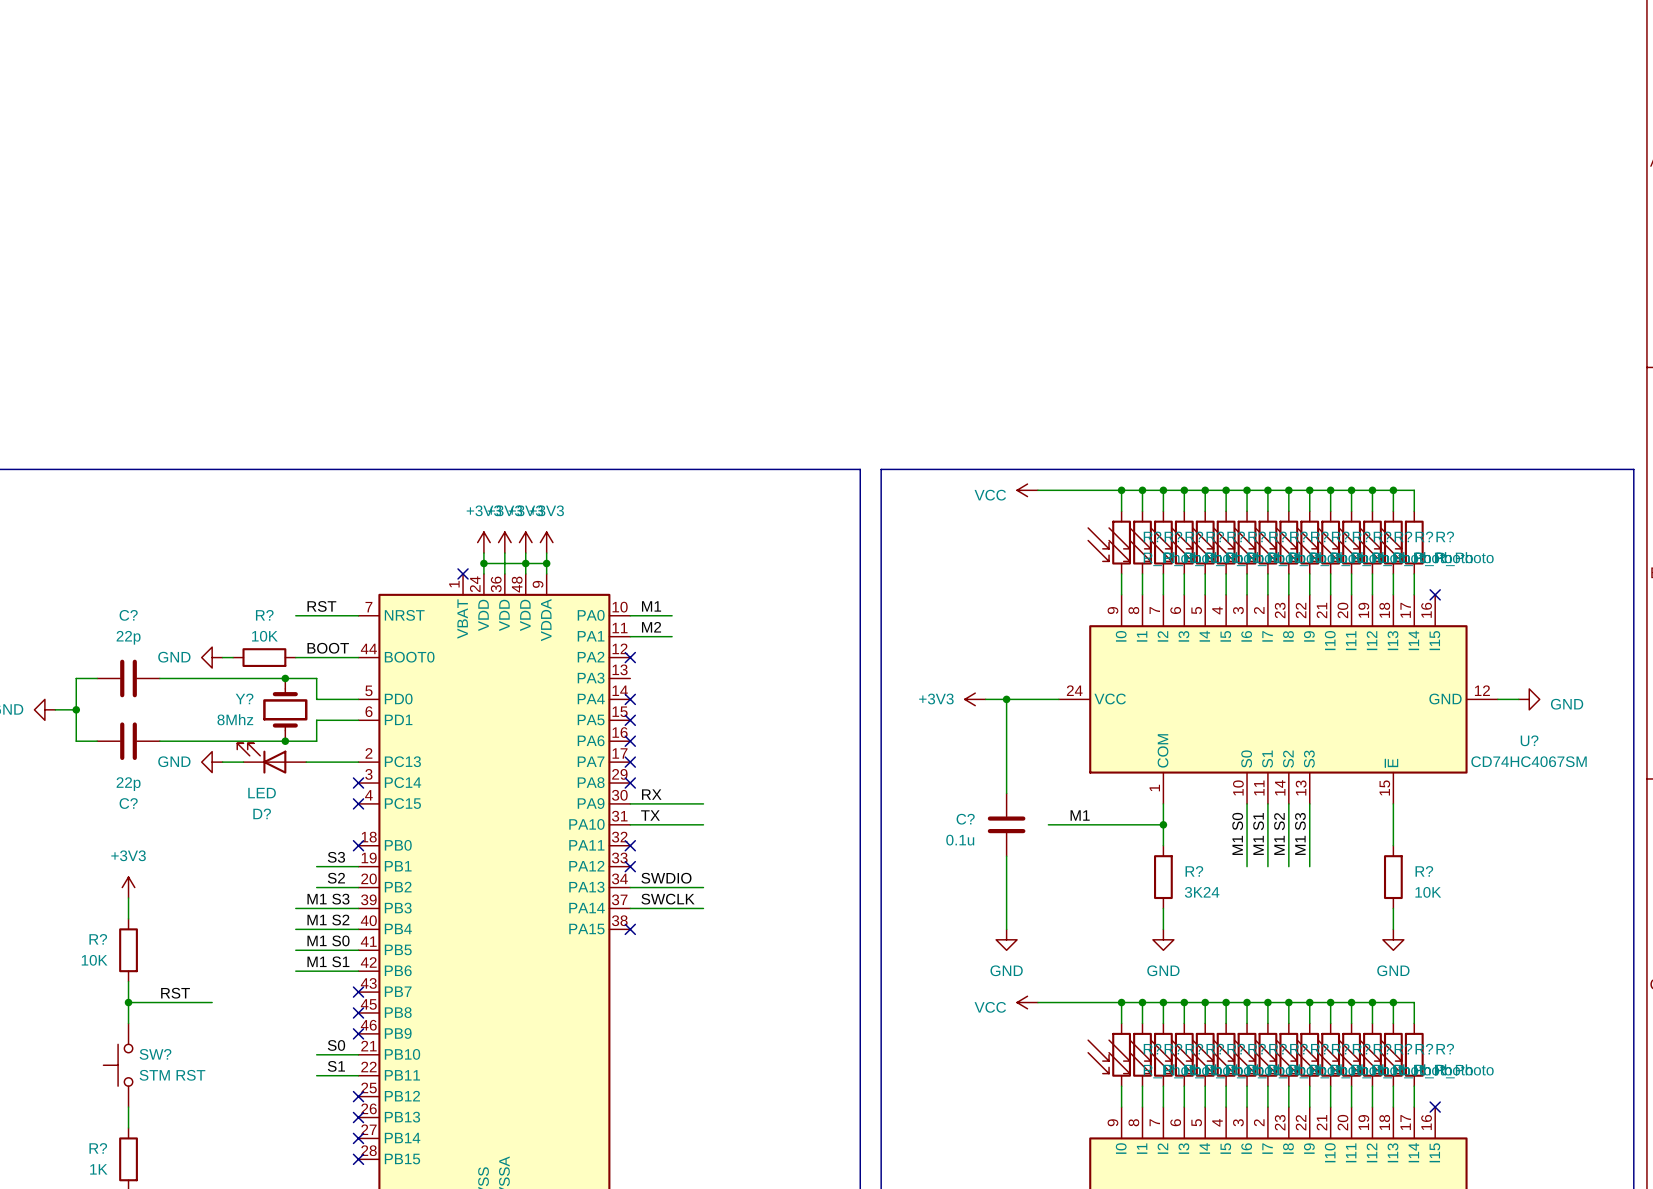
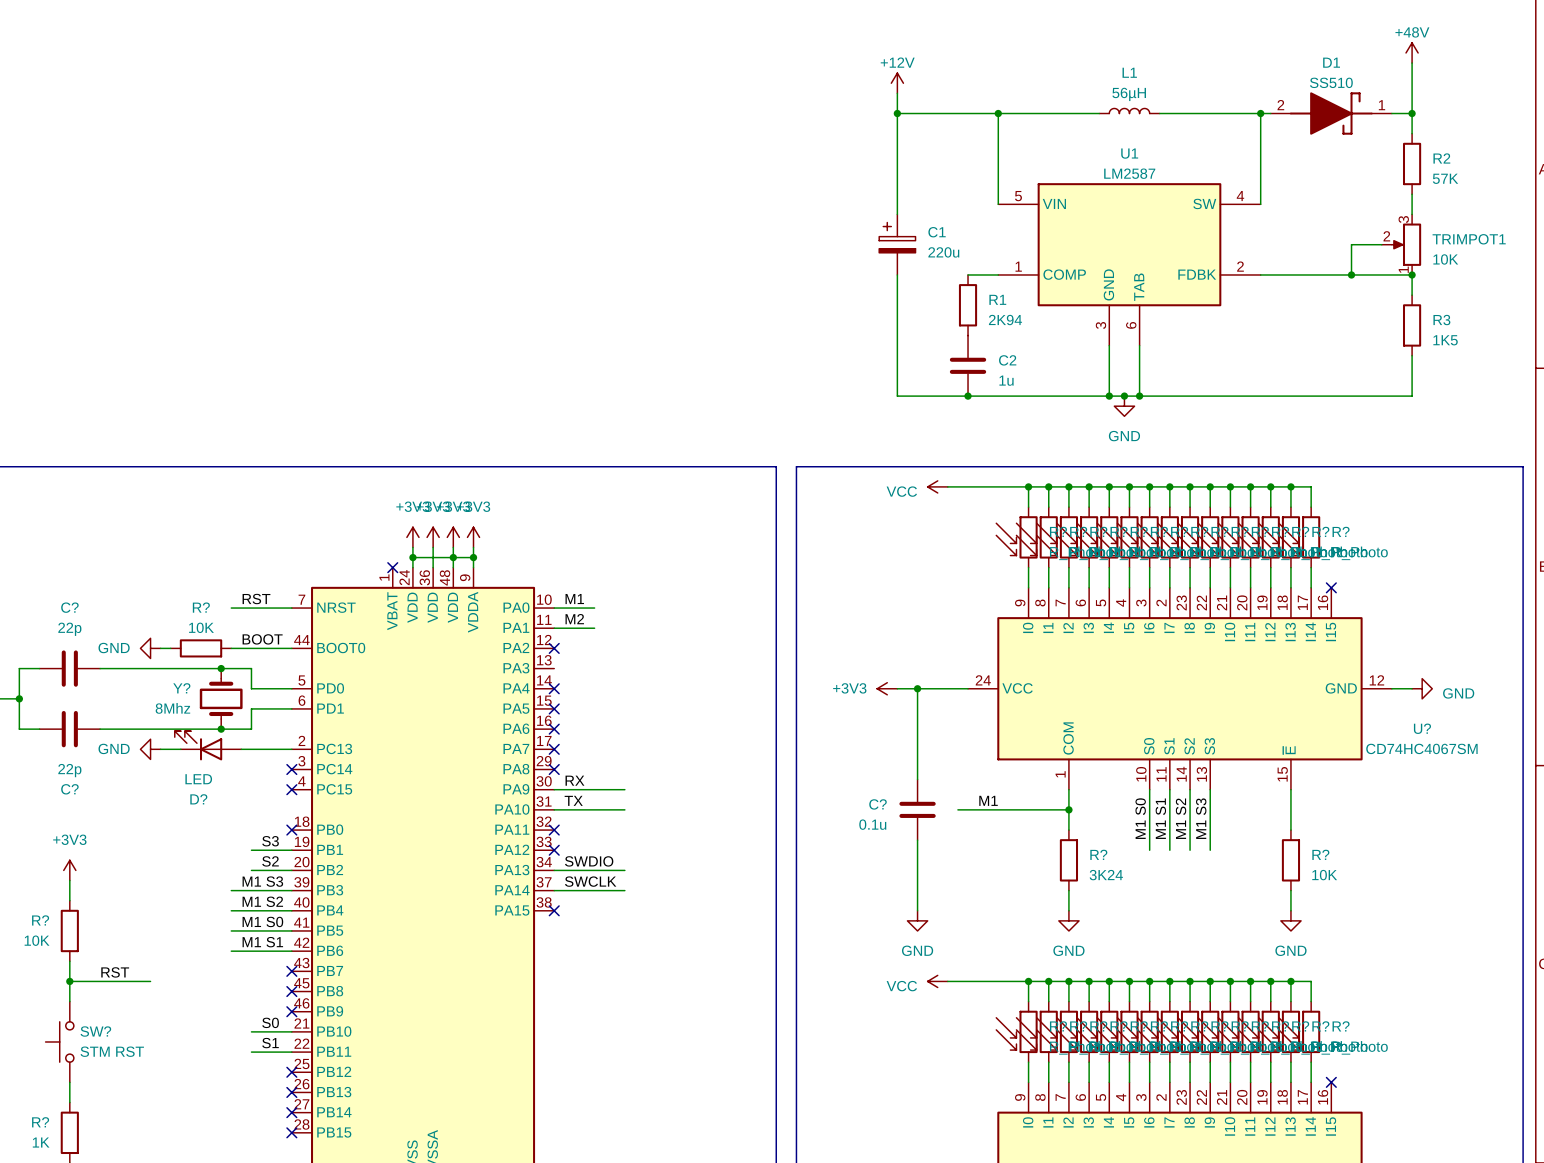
power symbol: none -> +48V (1412, 52)
wire: none -> (1412, 63) (1412, 133)
power symbol: none -> +12V (897, 83)
wire: none -> (897, 93) (897, 214)
L1: none -> 56µH (1129, 111)
wire: none -> (897, 113) (1099, 113)
junction: none -> (897, 113)
wire: none -> (998, 113) (998, 204)
junction: none -> (998, 113)
wire: none -> (1159, 113) (1270, 113)
wire: none -> (1260, 113) (1260, 204)
junction: none -> (1260, 113)
D1: none -> SS510 (1331, 113)
wire: none -> (1391, 113) (1412, 113)
junction: none -> (1412, 113)
R2: none -> 57K (1412, 163)
wire: none -> (1412, 194) (1412, 214)
C1: none -> 220u (897, 244)
wire: none -> (1381, 244) (1351, 244) (1351, 274)
TRIMPOT1: none -> 10K (1401, 244)
U1: none -> LM2587 (1129, 264)
wire: none -> (897, 274) (897, 396) (1412, 396) (1412, 355)
wire: none -> (968, 274) (998, 274)
wire: none -> (1260, 274) (1412, 274) (1412, 295)
junction: none -> (1351, 274)
junction: none -> (1412, 274)
R1: none -> 2K94 (968, 305)
R3: none -> 1K5 (1412, 325)
wire: none -> (1109, 345) (1109, 396)
wire: none -> (1139, 345) (1139, 396)
C2: none -> 1u (968, 365)
junction: none -> (968, 396)
junction: none -> (1109, 396)
junction: none -> (1124, 396)
junction: none -> (1139, 396)
power symbol: none -> GND (1124, 406)

